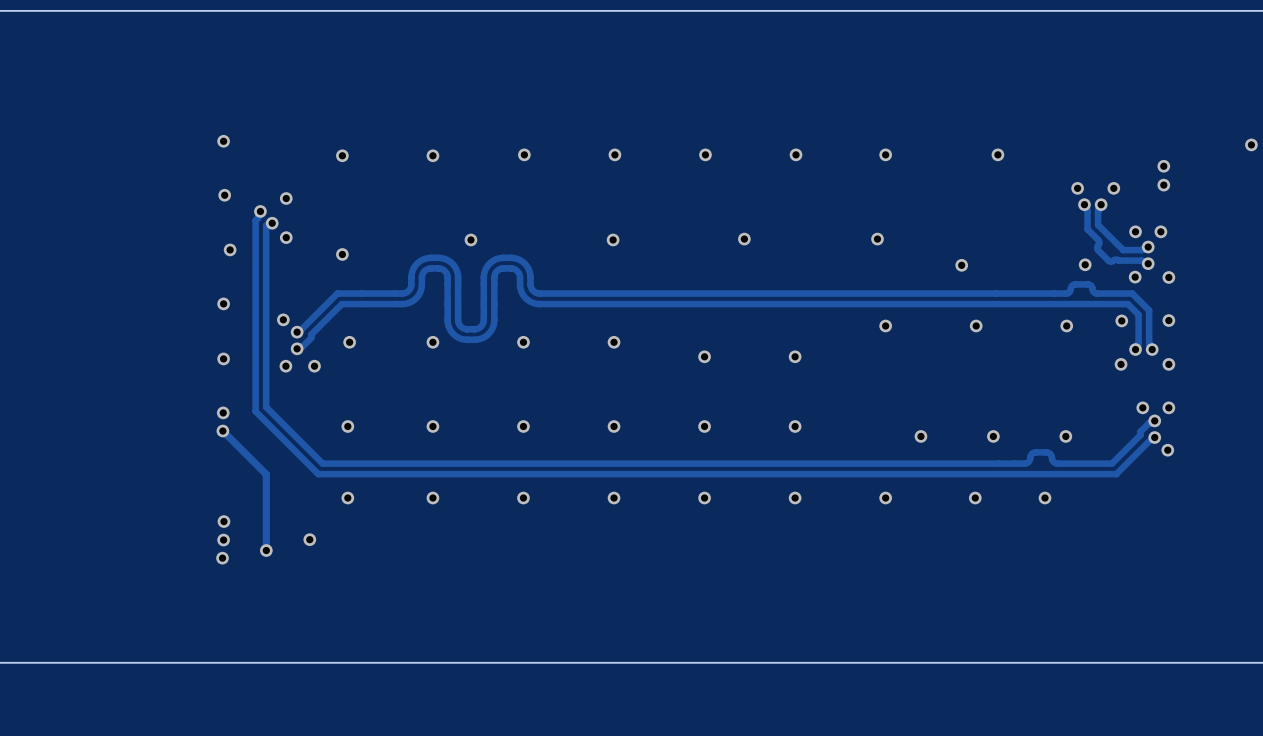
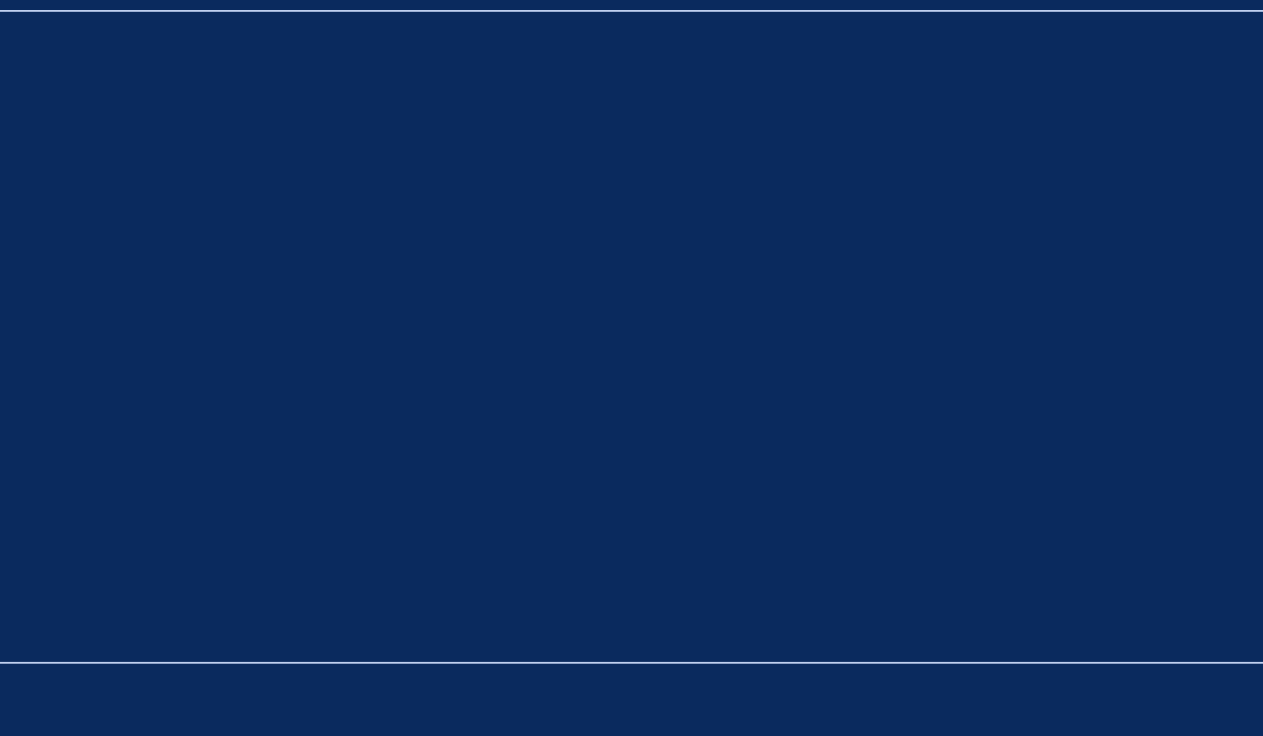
via: (223, 141) -> none
via: (1251, 144) -> none
via: (524, 154) -> none
via: (614, 154) -> none
via: (705, 154) -> none
via: (796, 154) -> none
via: (885, 154) -> none
via: (997, 154) -> none
via: (342, 155) -> none
via: (432, 155) -> none
via: (1163, 166) -> none
via: (1163, 185) -> none
via: (1077, 188) -> none
via: (1113, 188) -> none
via: (224, 195) -> none
via: (286, 198) -> none
track: (1084, 204) (1087, 211) (1087, 229) (1098, 240) (1097, 249) (1108, 260) (1141, 260) (1148, 263) -> none
via: (1084, 204) -> none
track: (1101, 204) (1098, 207) (1098, 224) (1123, 250) (1141, 250) (1148, 247) -> none
via: (1101, 204) -> none
track: (260, 211) (260, 214) (255, 220) (255, 411) (318, 474) (1116, 474) (1154, 437) -> none
via: (260, 211) -> none
track: (272, 223) (266, 225) (266, 407) (322, 463) (1024, 463) (1029, 461) (1031, 454) (1035, 452) (1048, 452) (1053, 461) (1056, 463) (1112, 463) (1140, 435) (1140, 431) (1148, 423) (1154, 420) -> none
via: (272, 223) -> none
via: (1135, 231) -> none
via: (1160, 231) -> none
via: (286, 237) -> none
via: (470, 239) -> none
via: (613, 239) -> none
via: (744, 239) -> none
via: (877, 239) -> none
via: (1148, 247) -> none
via: (230, 249) -> none
via: (342, 254) -> none
via: (1148, 263) -> none
via: (1085, 264) -> none
via: (961, 265) -> none
via: (1135, 277) -> none
via: (1168, 277) -> none
via: (223, 303) -> none
via: (283, 319) -> none
via: (1121, 320) -> none
via: (1168, 320) -> none
via: (885, 325) -> none
via: (976, 325) -> none
via: (1066, 325) -> none
track: (297, 332) (337, 293) (406, 292) (411, 286) (414, 267) (420, 260) (431, 257) (444, 258) (455, 267) (457, 275) (458, 323) (464, 328) (478, 328) (483, 321) (483, 277) (485, 269) (494, 259) (510, 257) (519, 259) (526, 265) (530, 273) (531, 287) (535, 292) (539, 293) (1066, 293) (1069, 291) (1073, 284) (1088, 284) (1095, 293) (1132, 293) (1149, 310) (1149, 343) (1152, 349) -> none
via: (297, 332) -> none
via: (349, 342) -> none
via: (432, 342) -> none
via: (523, 342) -> none
via: (614, 342) -> none
track: (297, 348) (302, 346) (311, 338) (311, 334) (341, 304) (402, 304) (412, 301) (420, 290) (423, 272) (431, 268) (441, 269) (447, 275) (447, 322) (451, 332) (462, 339) (481, 338) (488, 334) (493, 324) (495, 274) (500, 269) (510, 268) (515, 269) (519, 274) (520, 288) (524, 296) (537, 303) (1127, 304) (1138, 314) (1138, 343) (1135, 349) -> none
via: (297, 348) -> none
via: (1135, 349) -> none
via: (1152, 349) -> none
via: (704, 356) -> none
via: (795, 356) -> none
via: (223, 358) -> none
via: (1121, 364) -> none
via: (1168, 364) -> none
via: (285, 366) -> none
via: (314, 366) -> none
via: (1142, 407) -> none
via: (1168, 407) -> none
via: (223, 412) -> none
via: (1154, 420) -> none
via: (347, 426) -> none
via: (432, 426) -> none
via: (523, 426) -> none
via: (614, 426) -> none
via: (704, 426) -> none
via: (795, 426) -> none
track: (222, 431) (266, 474) (266, 550) -> none
via: (222, 431) -> none
via: (920, 436) -> none
via: (993, 436) -> none
via: (1065, 436) -> none
via: (1154, 437) -> none
via: (1167, 450) -> none
via: (347, 498) -> none
via: (432, 498) -> none
via: (523, 498) -> none
via: (614, 498) -> none
via: (704, 498) -> none
via: (795, 498) -> none
via: (885, 498) -> none
via: (975, 498) -> none
via: (1045, 498) -> none
via: (223, 521) -> none
via: (309, 539) -> none
via: (223, 540) -> none
via: (266, 550) -> none
via: (222, 558) -> none

